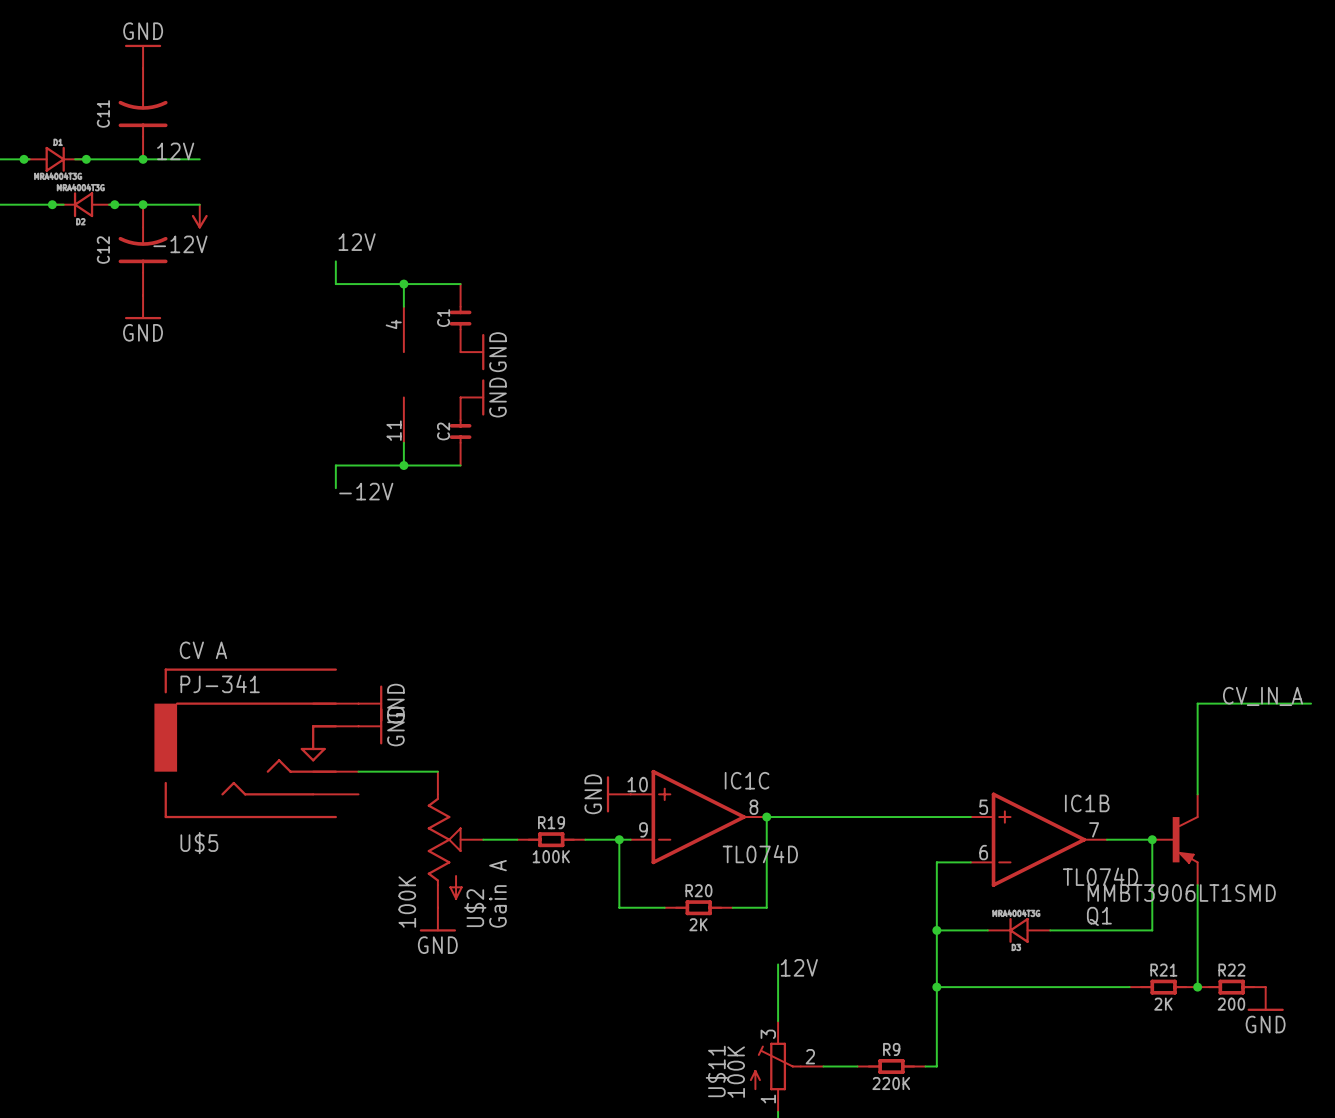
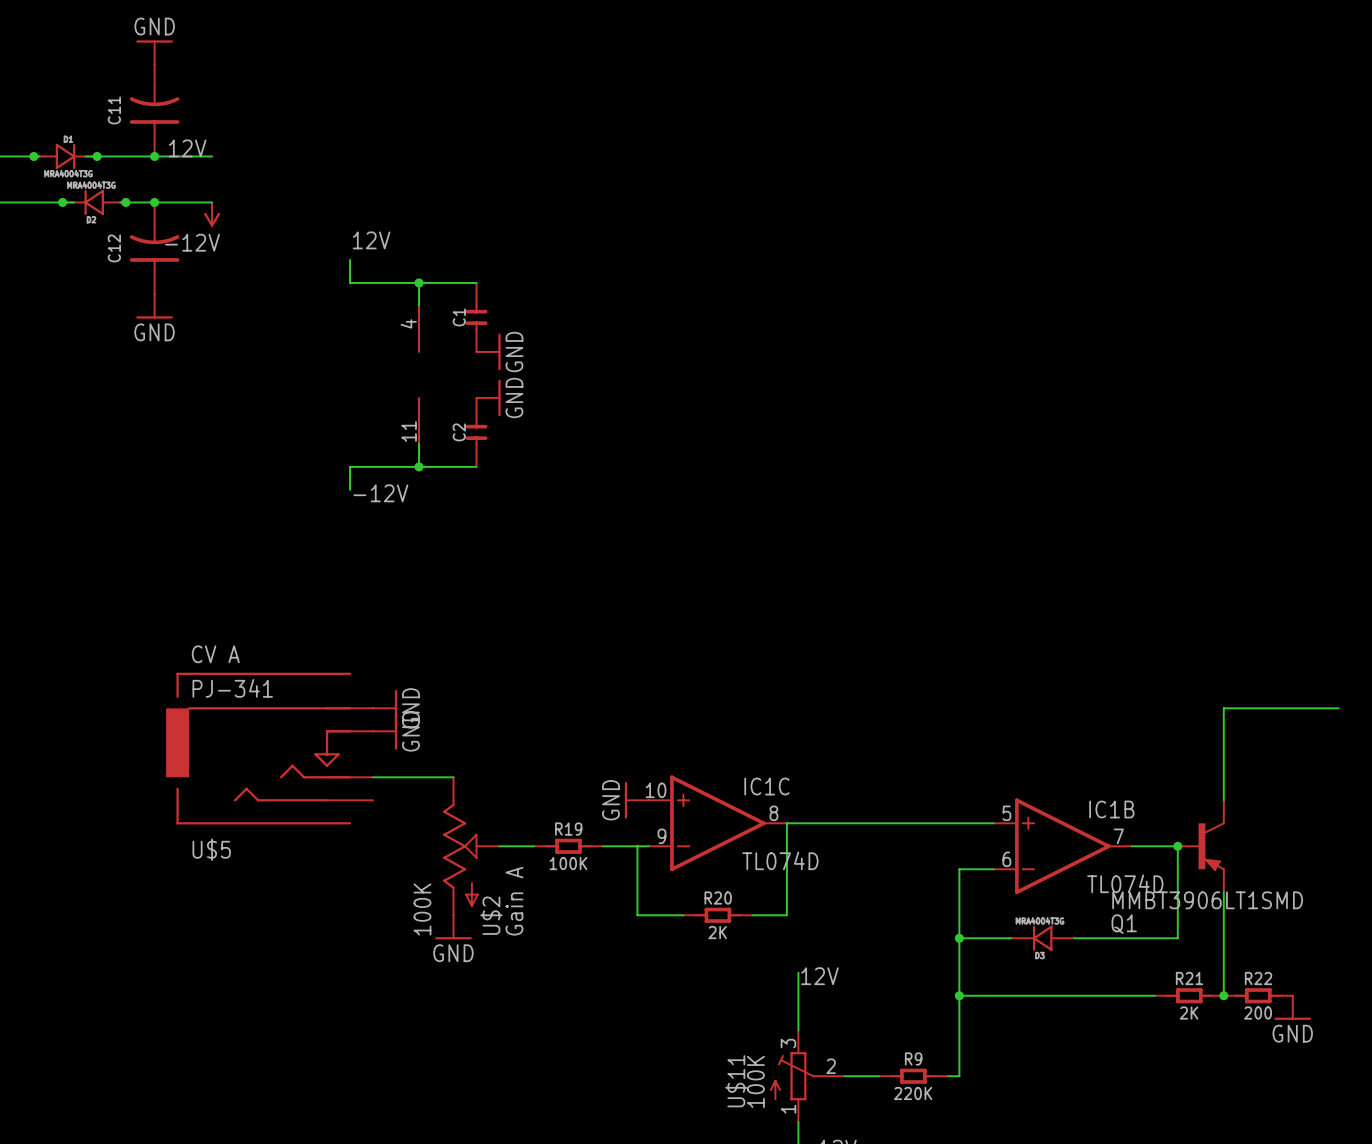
label: CV_IN_A (1263, 696) -> none
junction: (766, 817) -> none
junction: (619, 839) -> none

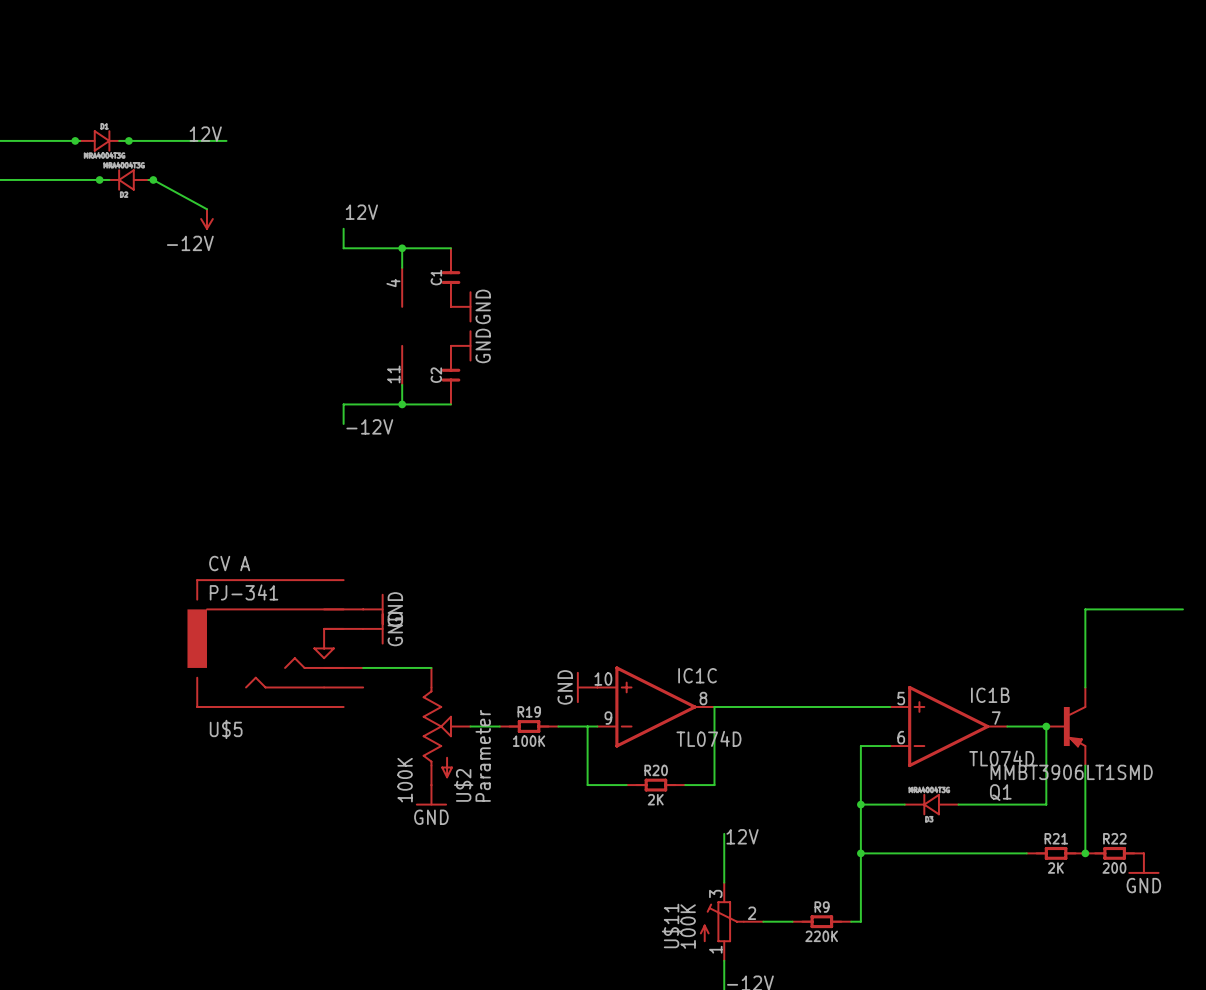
power symbol: GND (154, 52) -> none
C11: (154, 110) -> none
junction: (154, 156) -> none
wire: (125, 202) (212, 202) -> (153, 179) (206, 209)
junction: (154, 202) -> none
power symbol position: -12V (212, 214) -> -12V (206, 219)
C12: (154, 248) -> none
power symbol: GND (154, 306) -> none
U$2 text: Gain A (514, 901) -> Parameter (483, 755)

